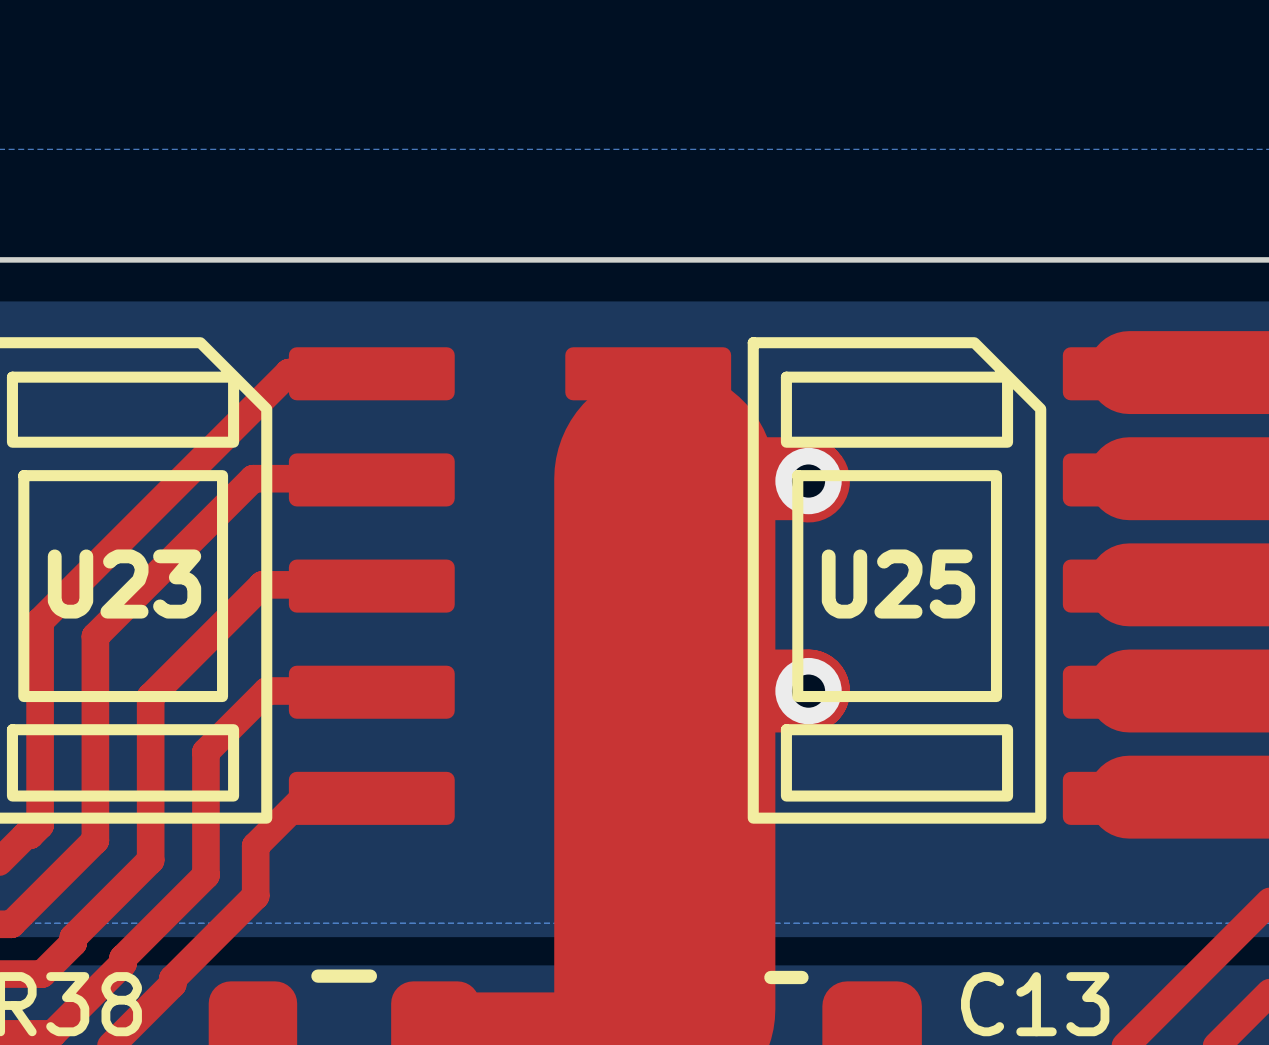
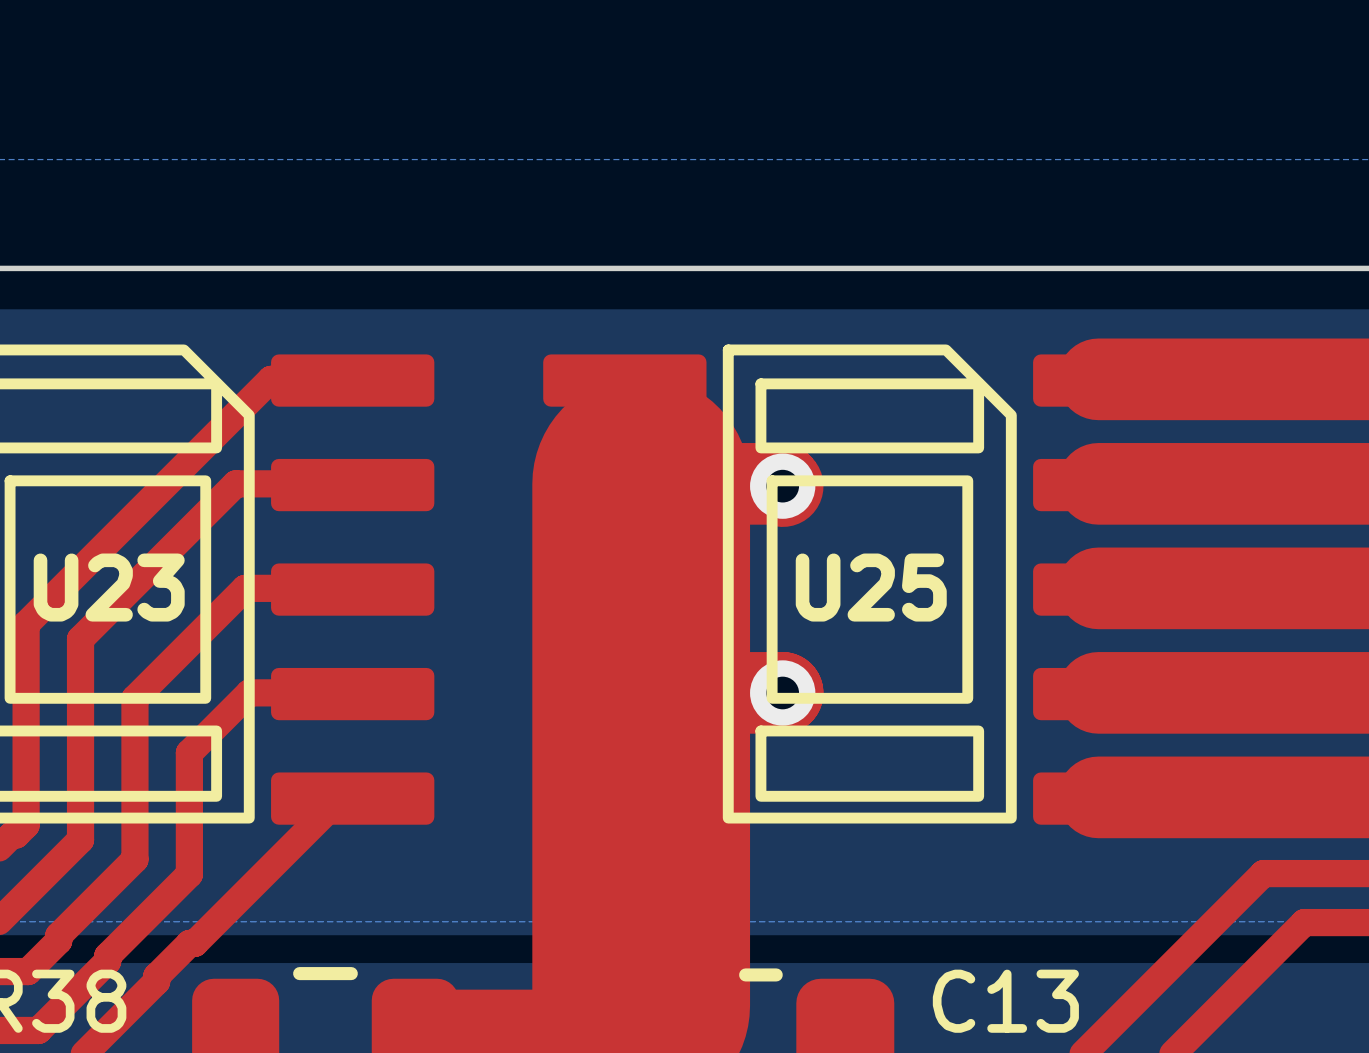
top track: (355, 797) (304, 797) (255, 845) (255, 895) (206, 945) -> (336, 797) (336, 801) (194, 943) (189, 943)

